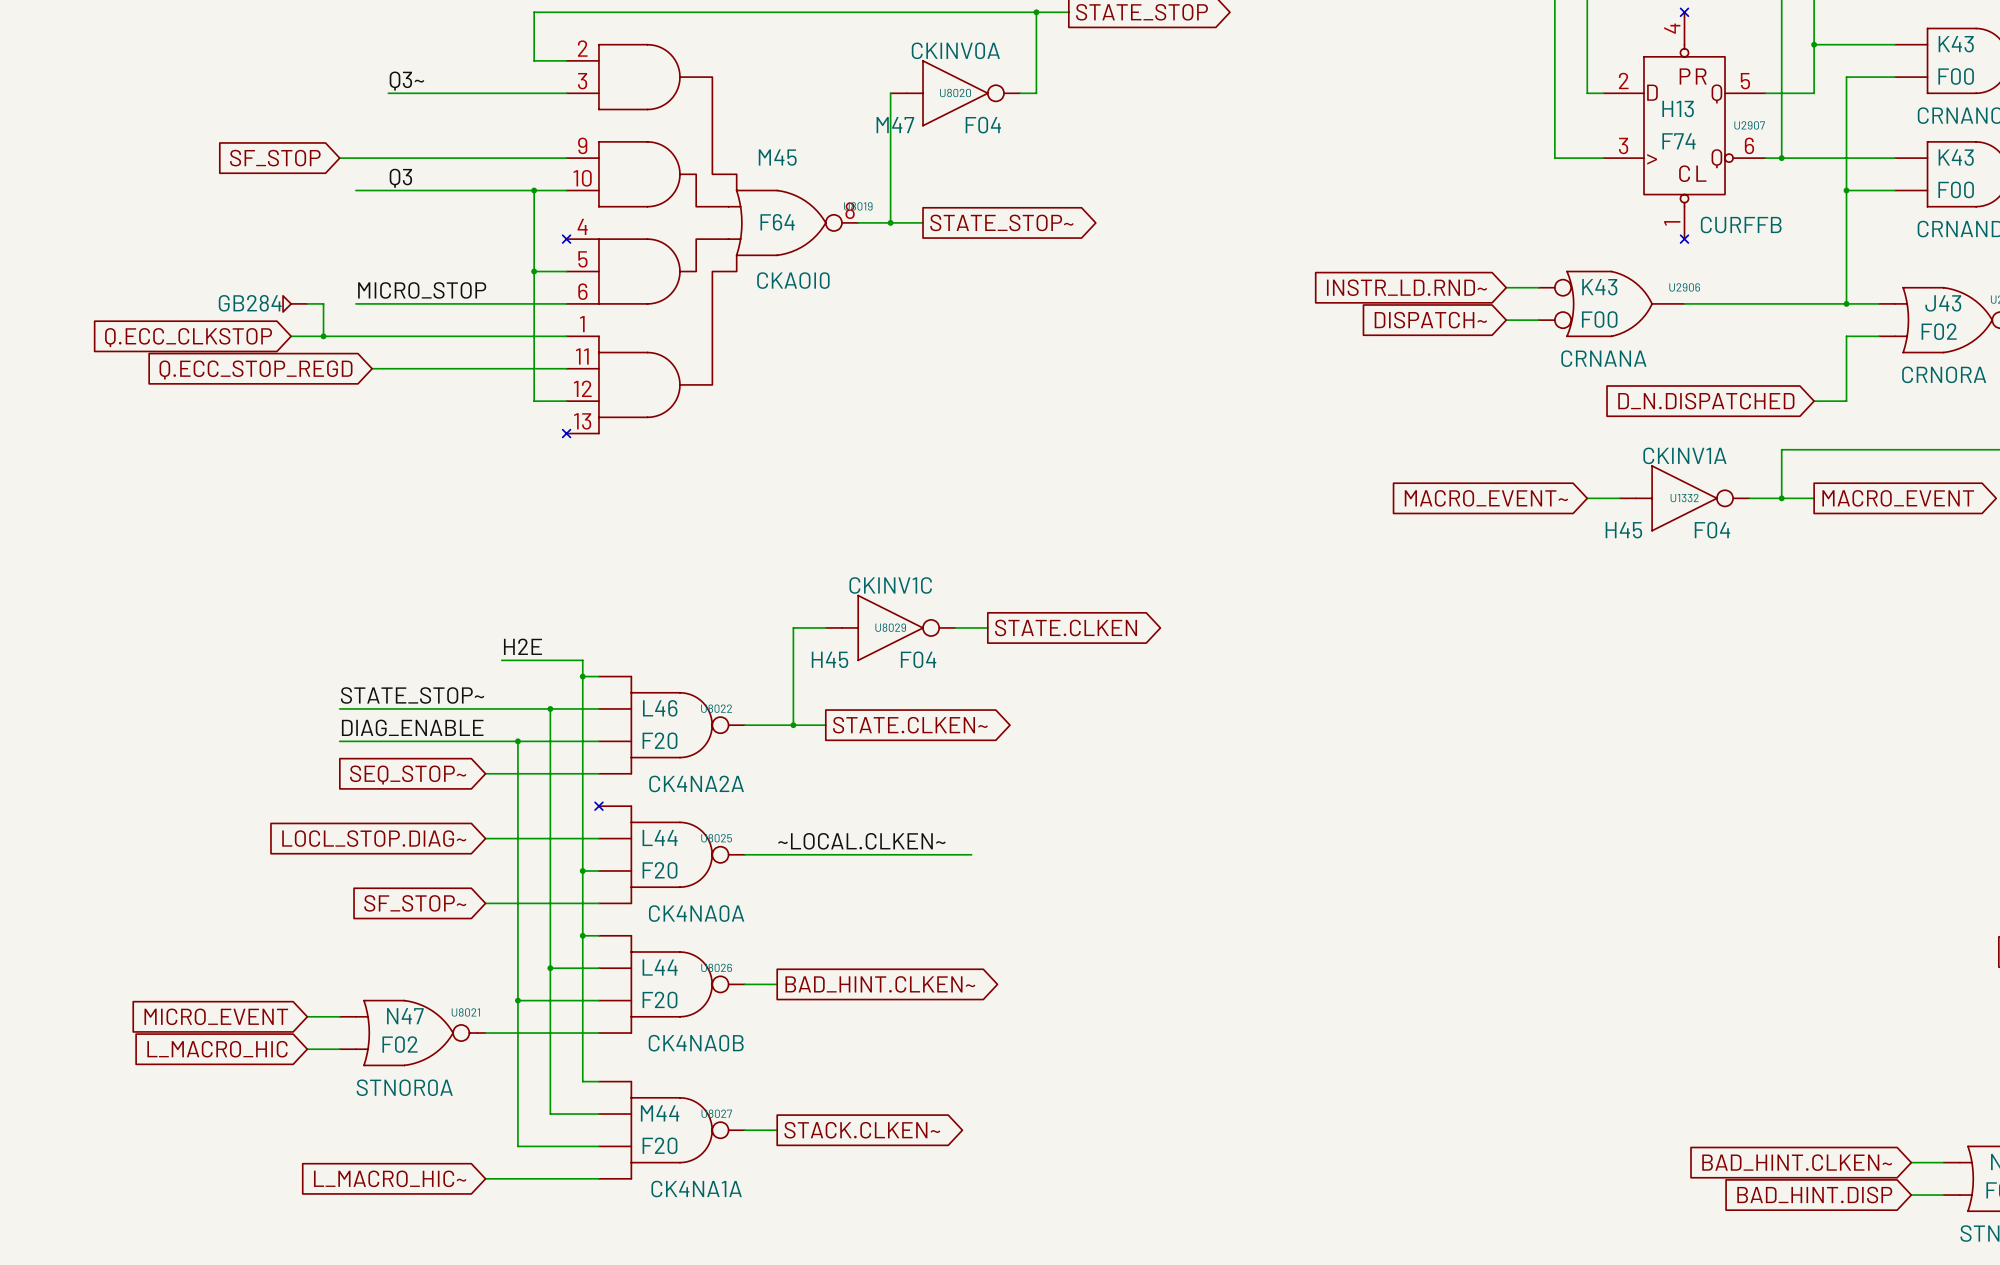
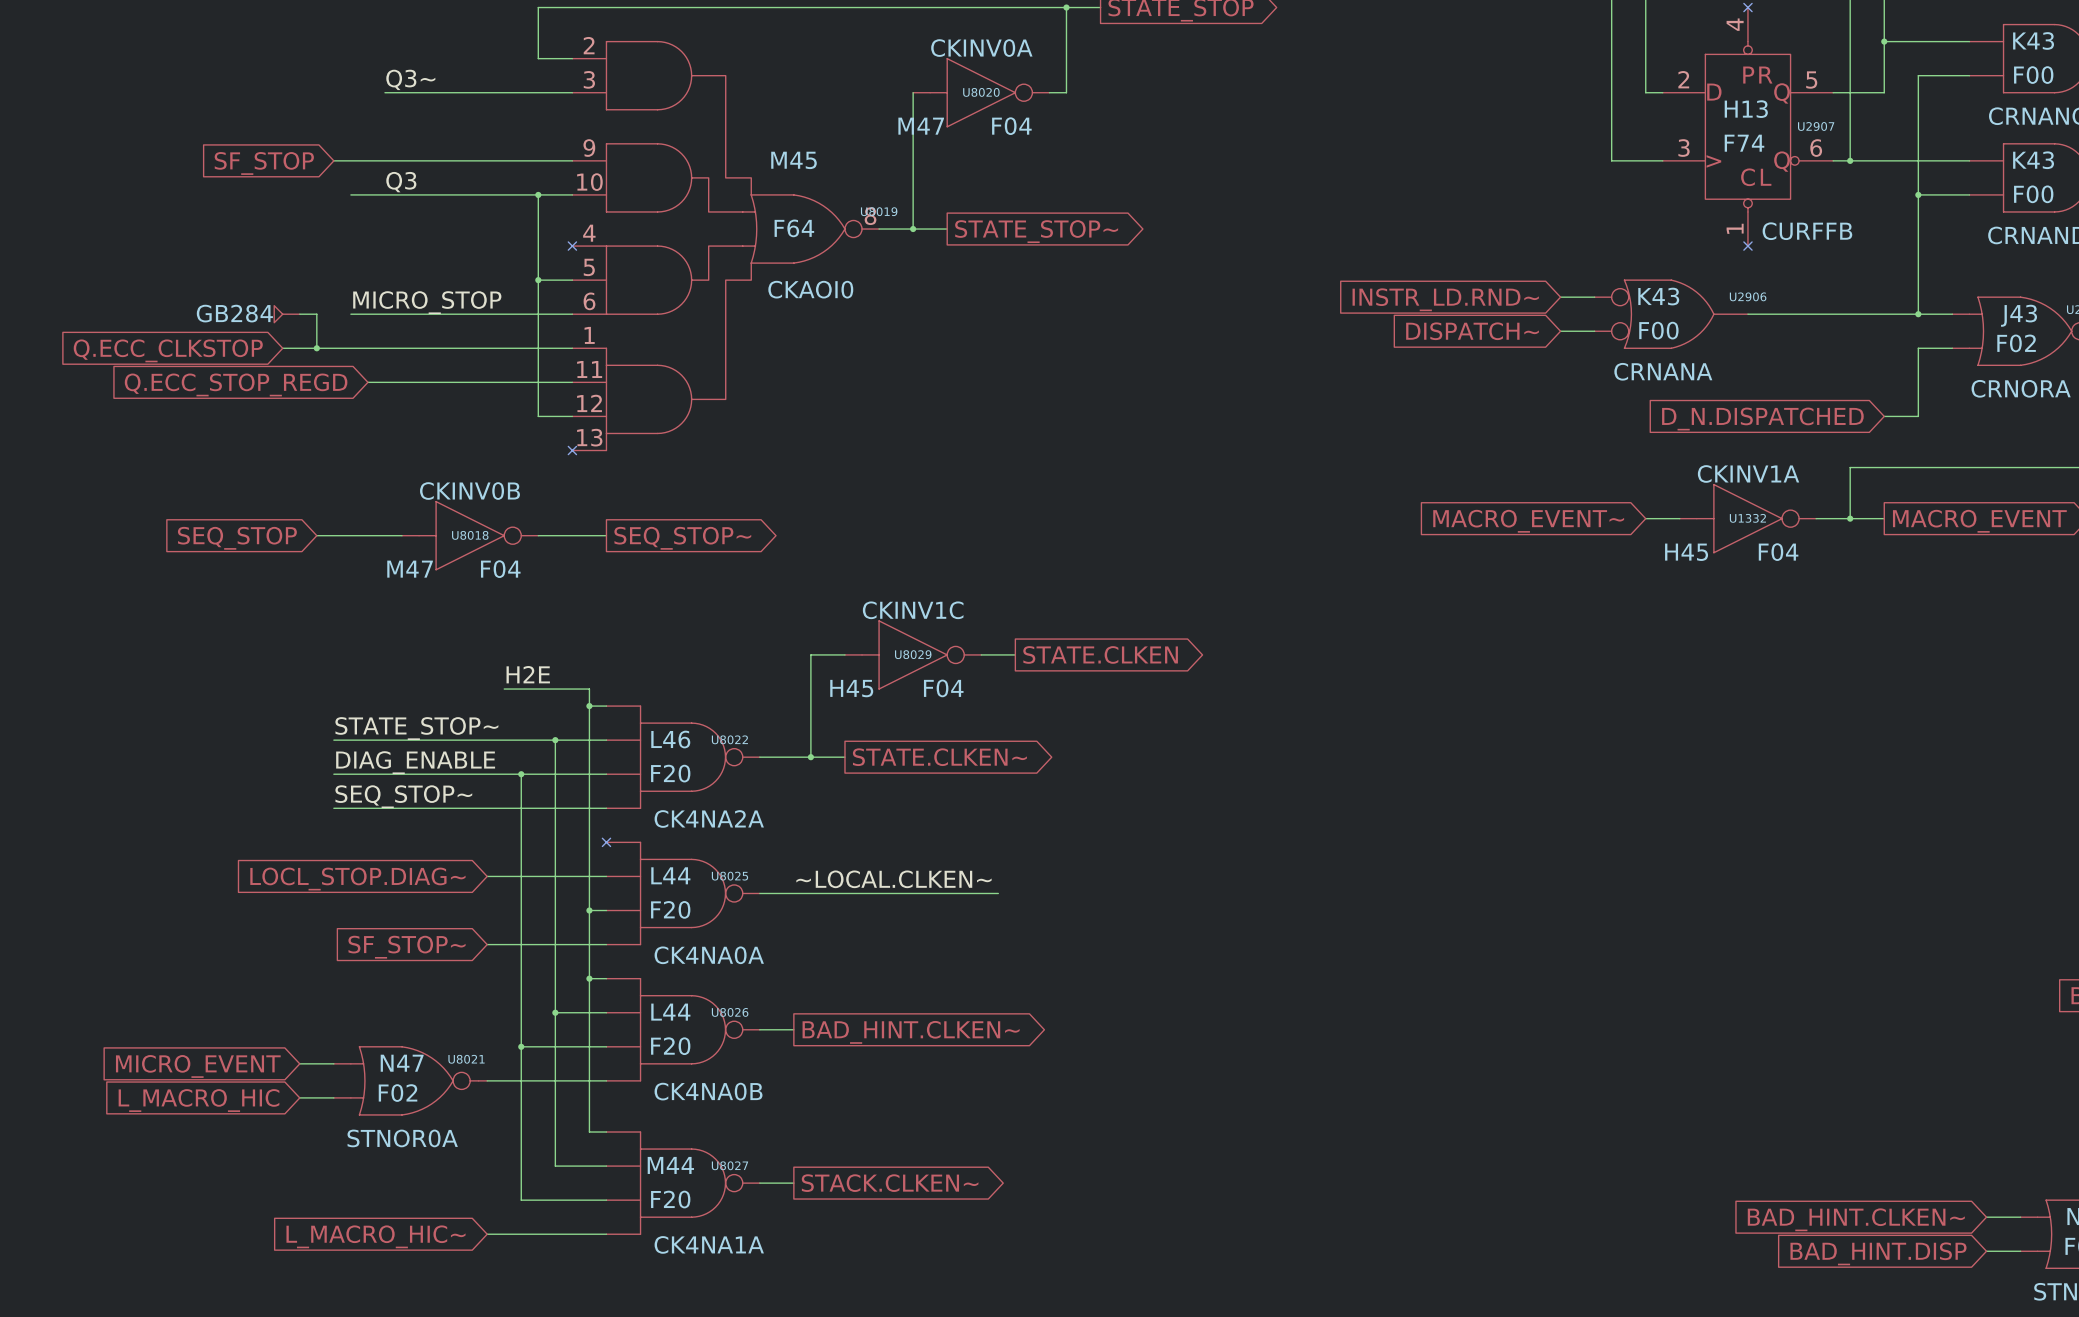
wire: none -> (316, 535) (402, 535)
U8018: none -> F04 (470, 535)
wire: none -> (538, 535) (606, 535)
global label: none -> SEQ_STOP (237, 538)
global label: none -> SEQ_STOP~ (682, 538)
label: none -> SEQ_STOP~ (403, 796)
wire: none -> (333, 808) (487, 808)
global label: SEQ_STOP~ (408, 775) -> none

